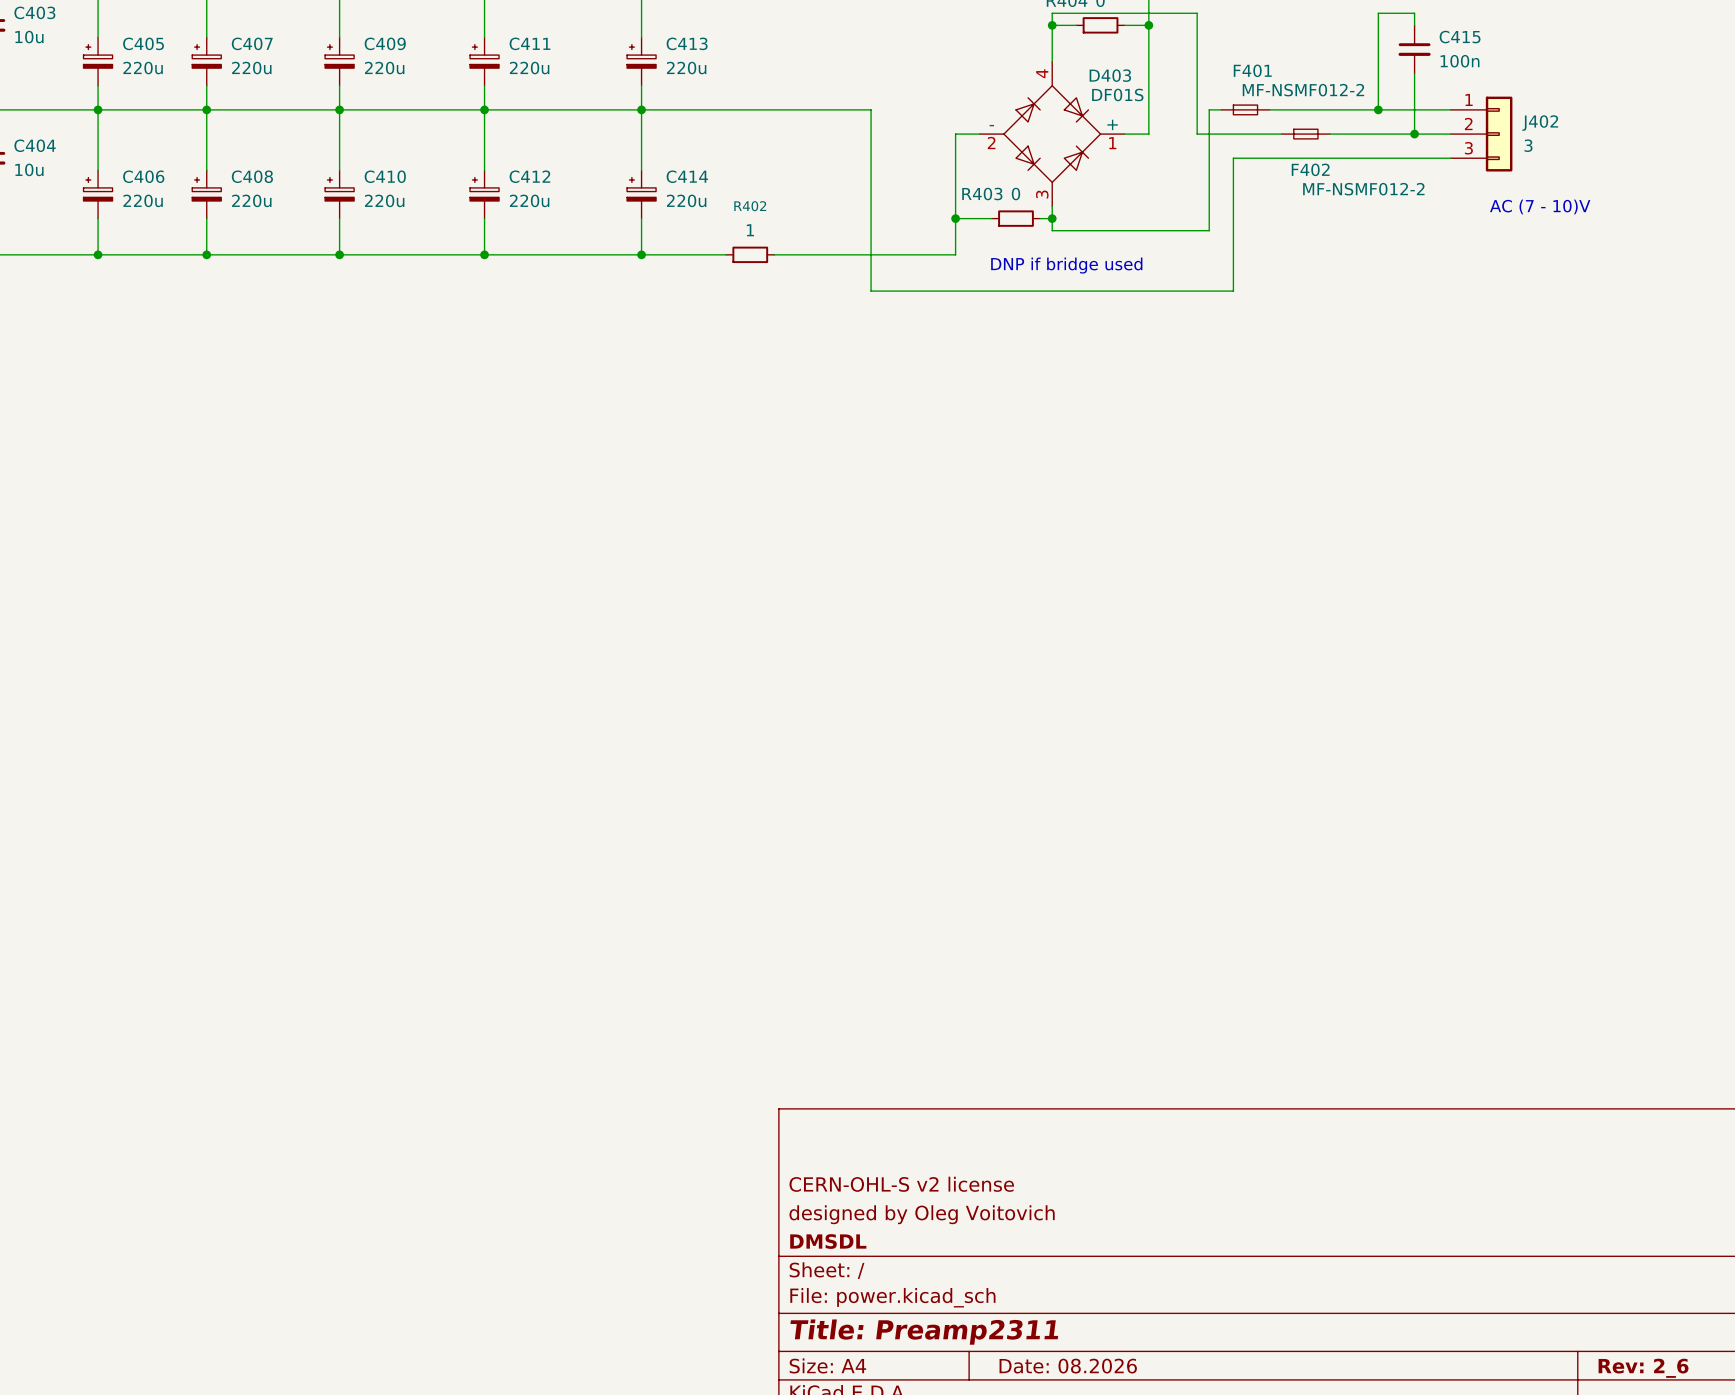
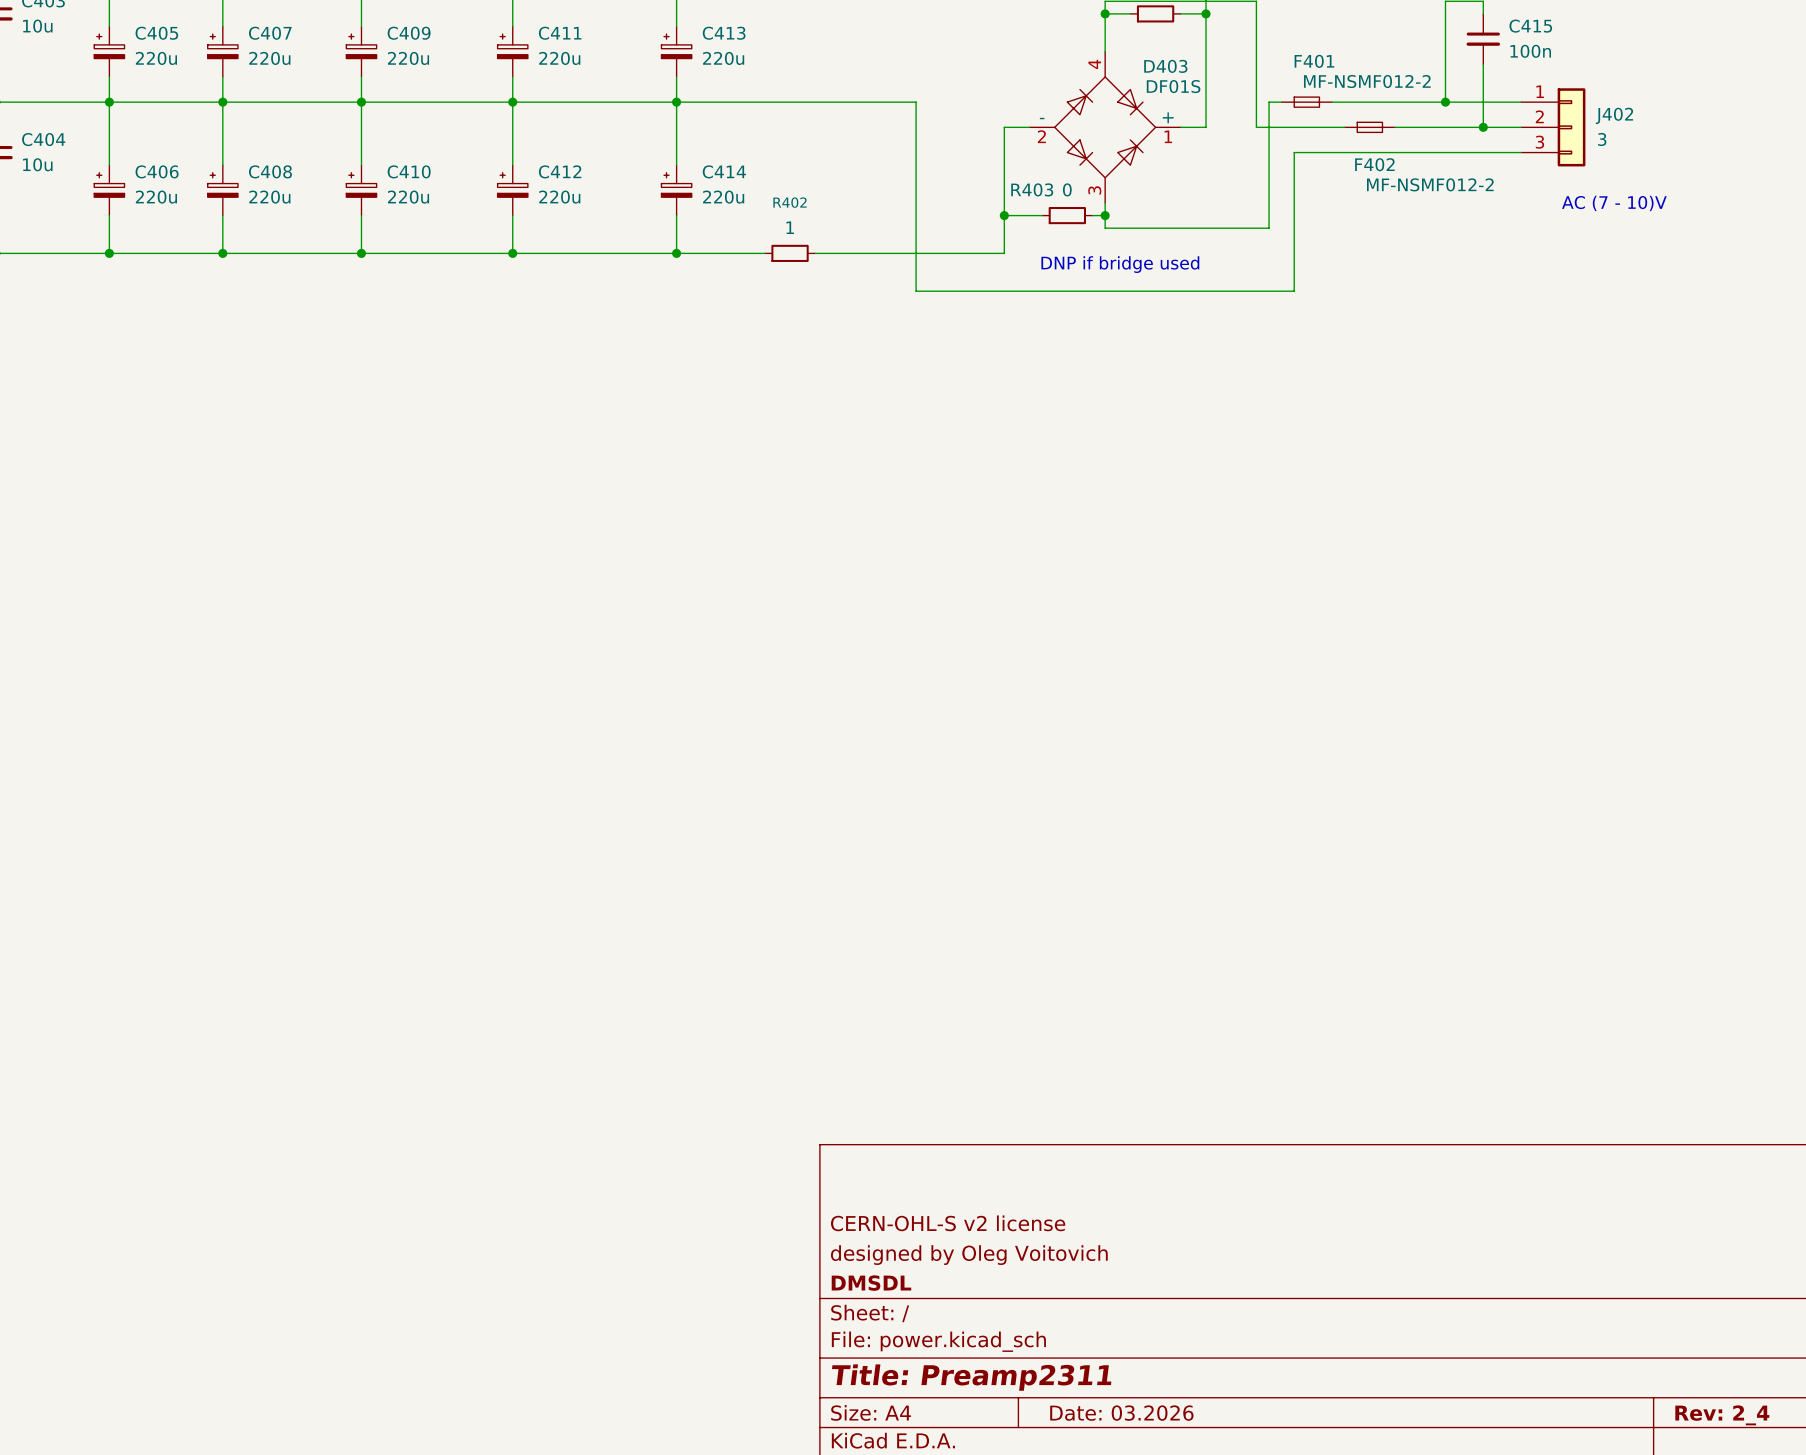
title block: Date: 08.2026 (1068, 1366) -> Date: 03.2026 (1121, 1413)
title block: Rev: 2_6 (1643, 1368) -> Rev: 2_4 (1722, 1415)

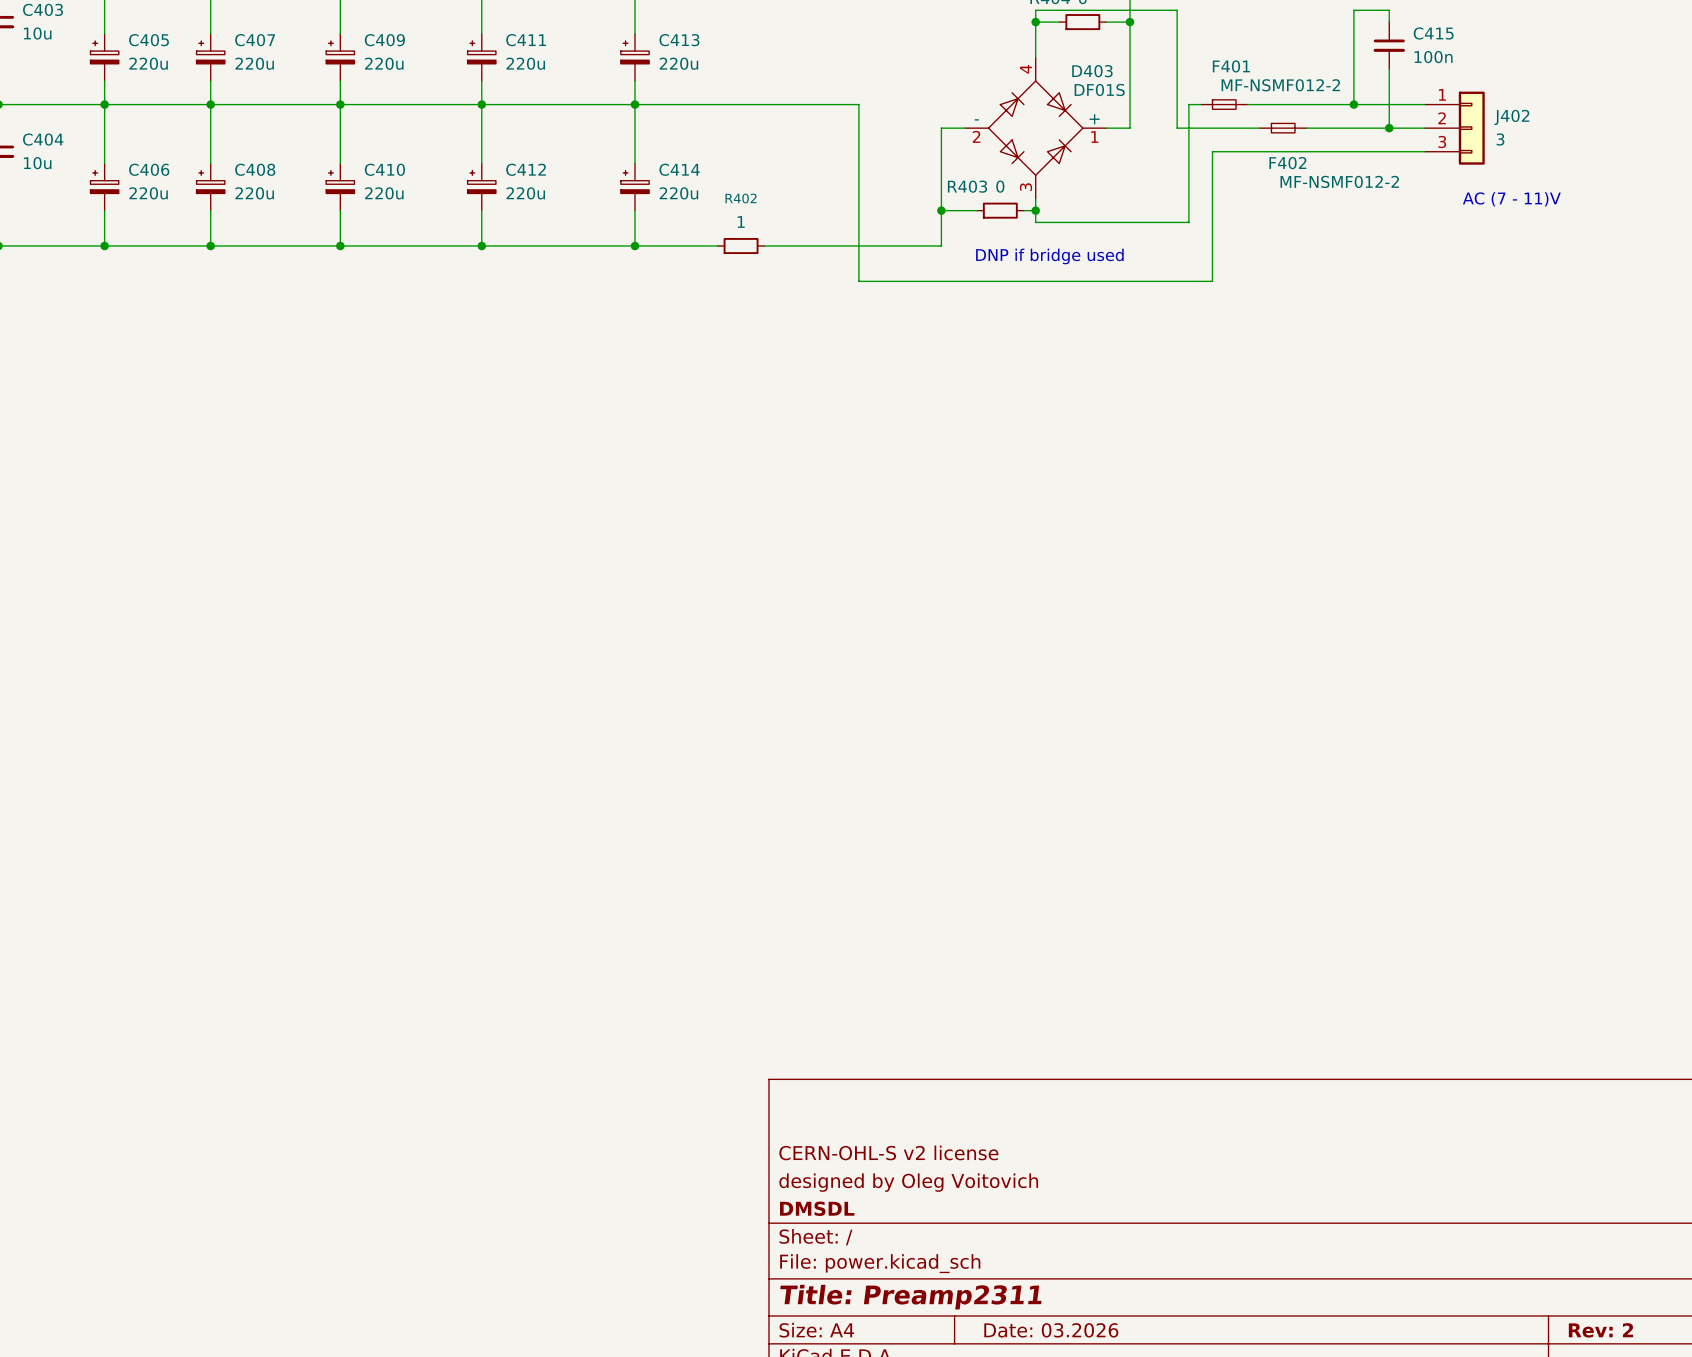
text: AC (7 - 10)V (1614, 203) -> AC (7 - 11)V (1511, 199)
title block: Rev: 2_4 (1722, 1415) -> Rev: 2 (1600, 1330)

